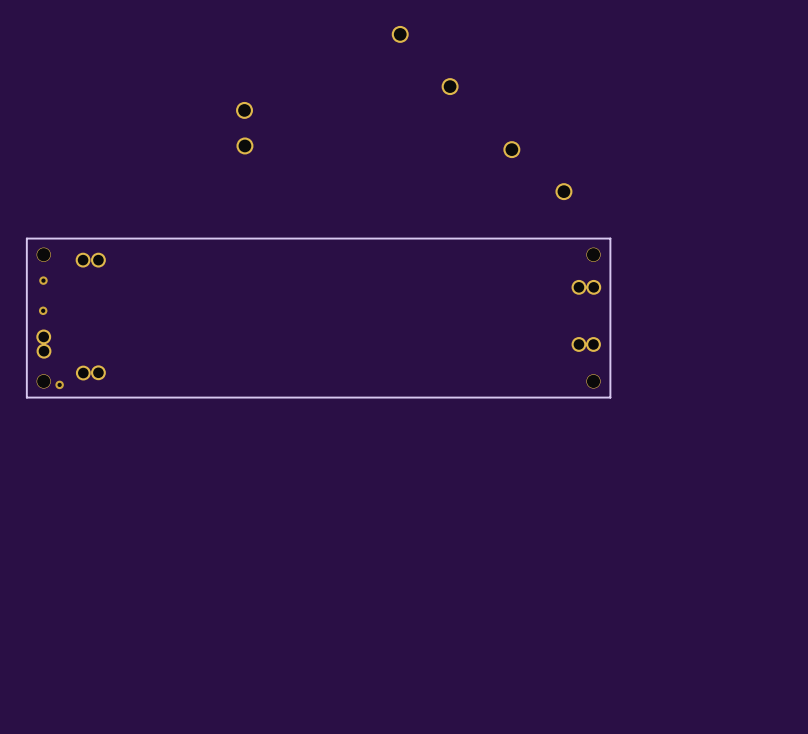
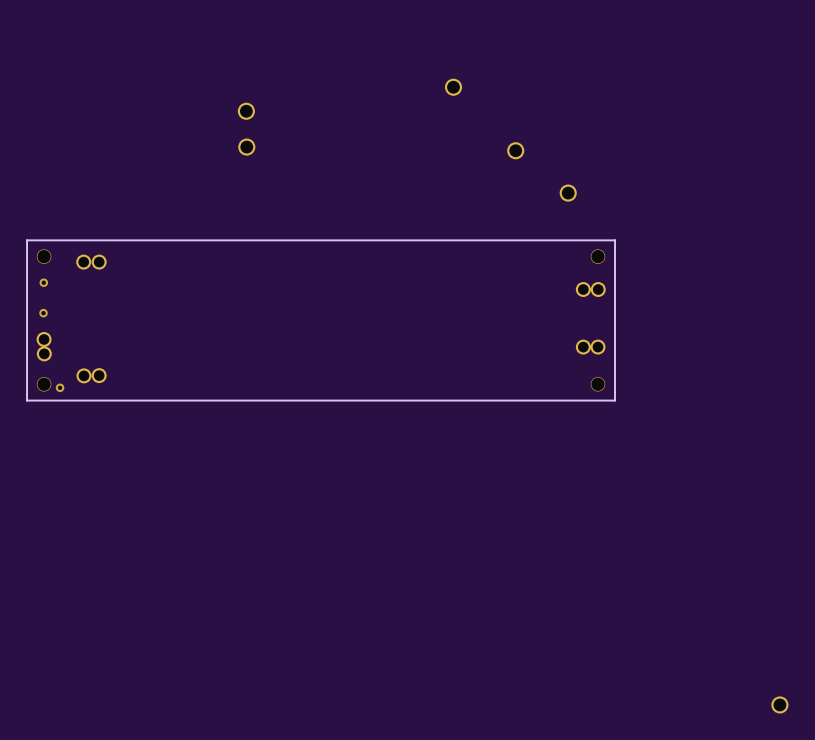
part: (400, 34) -> none
part: none -> (779, 704)

